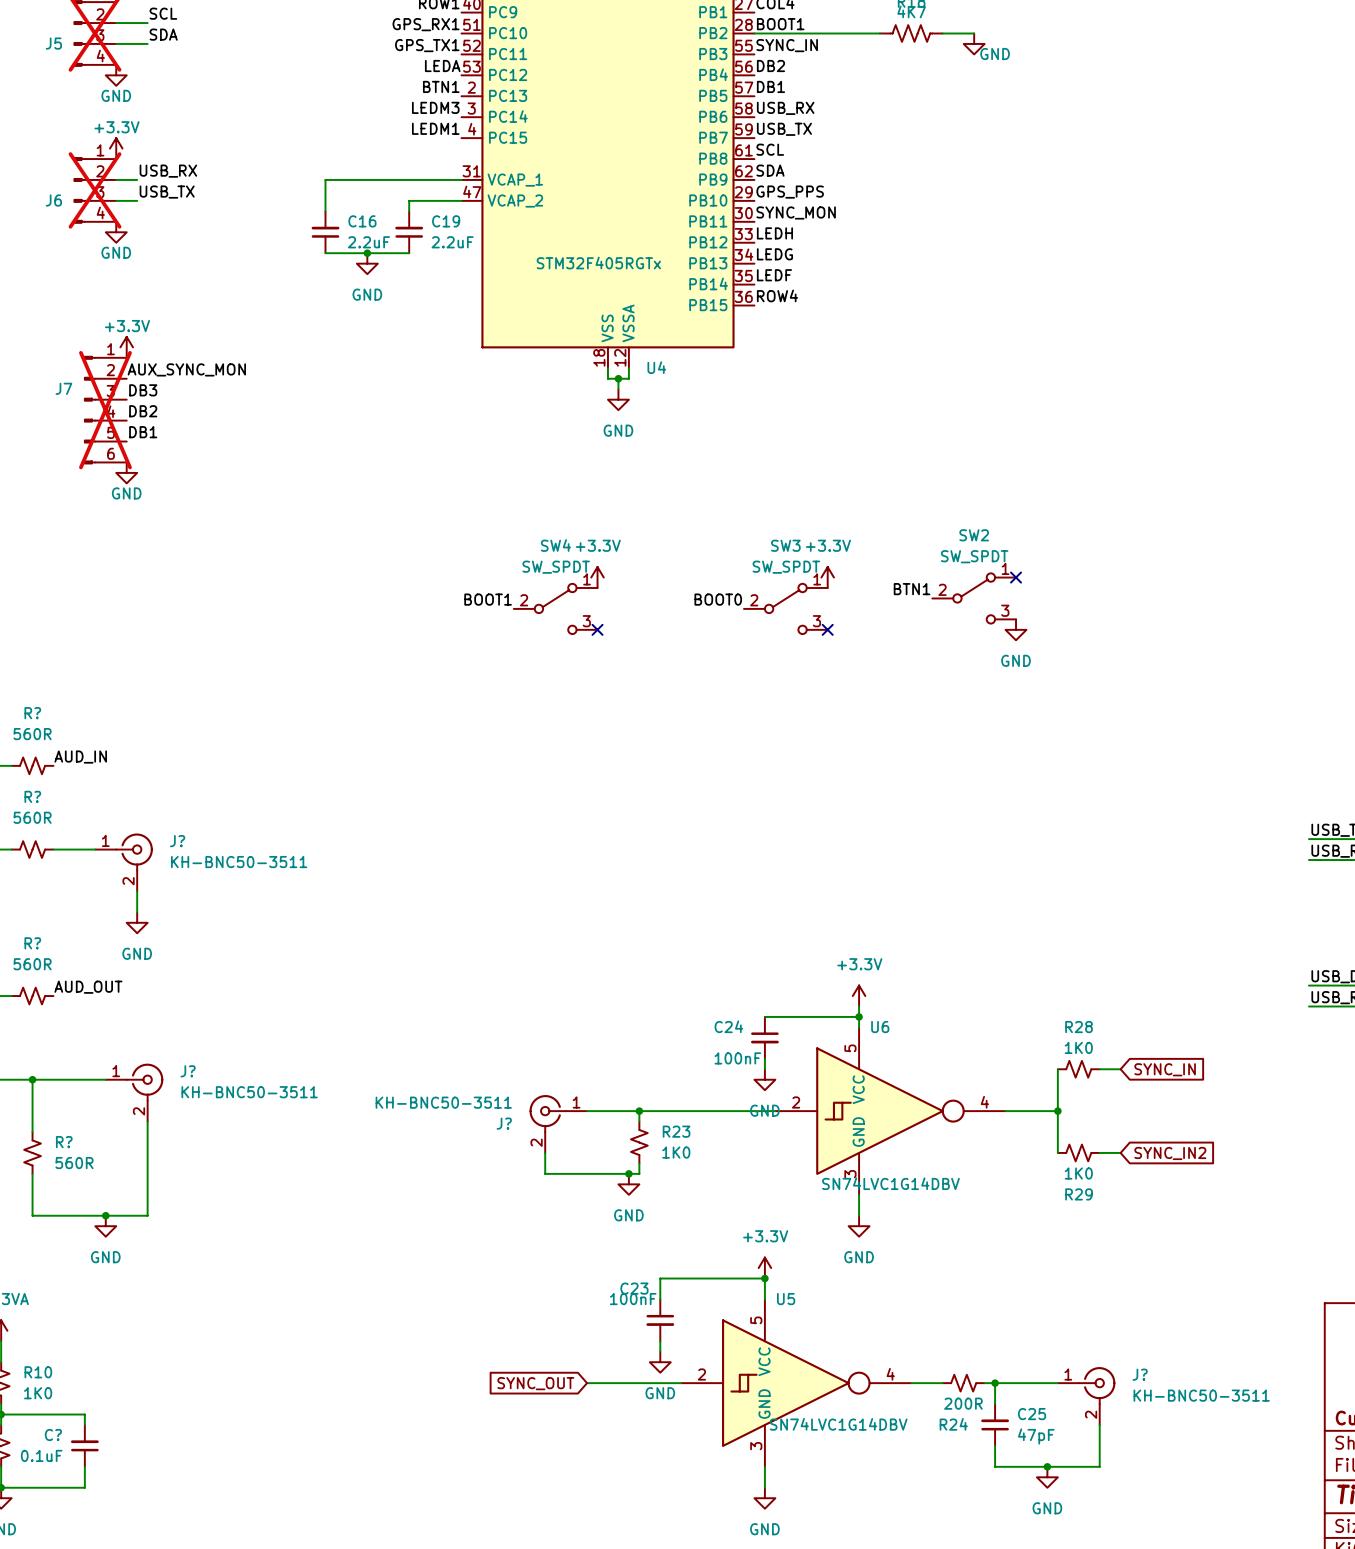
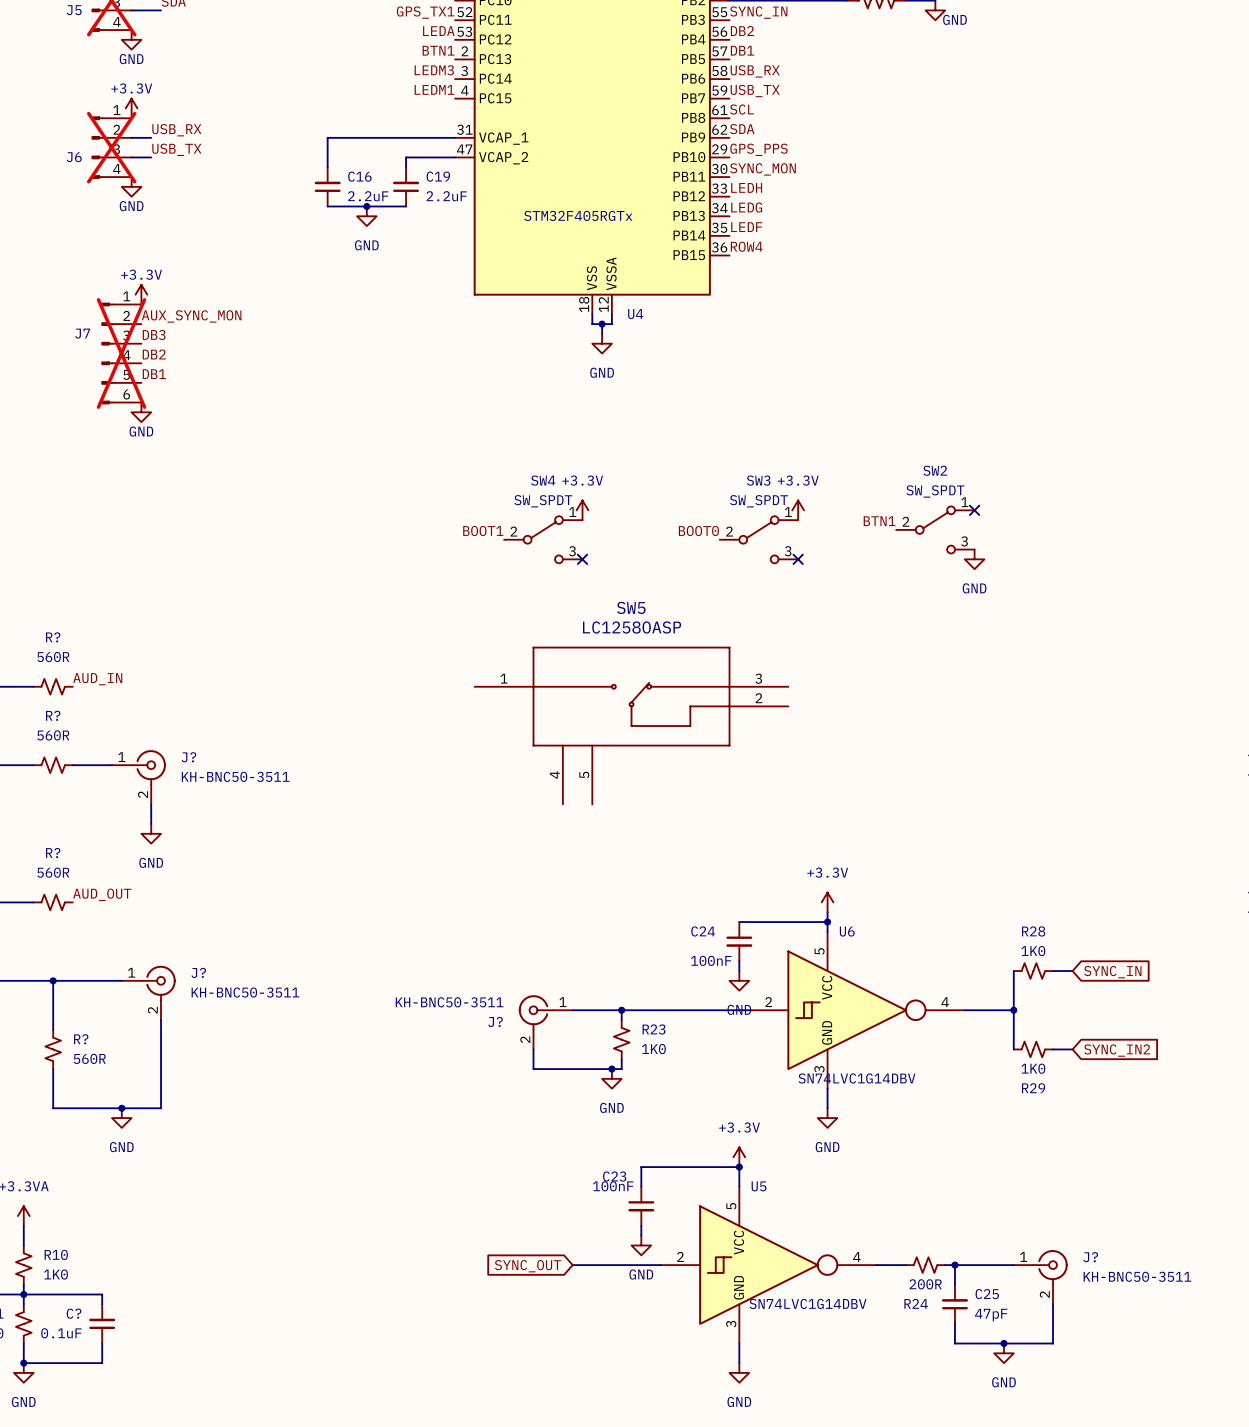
SW5: none -> LC1258OASP (631, 725)

